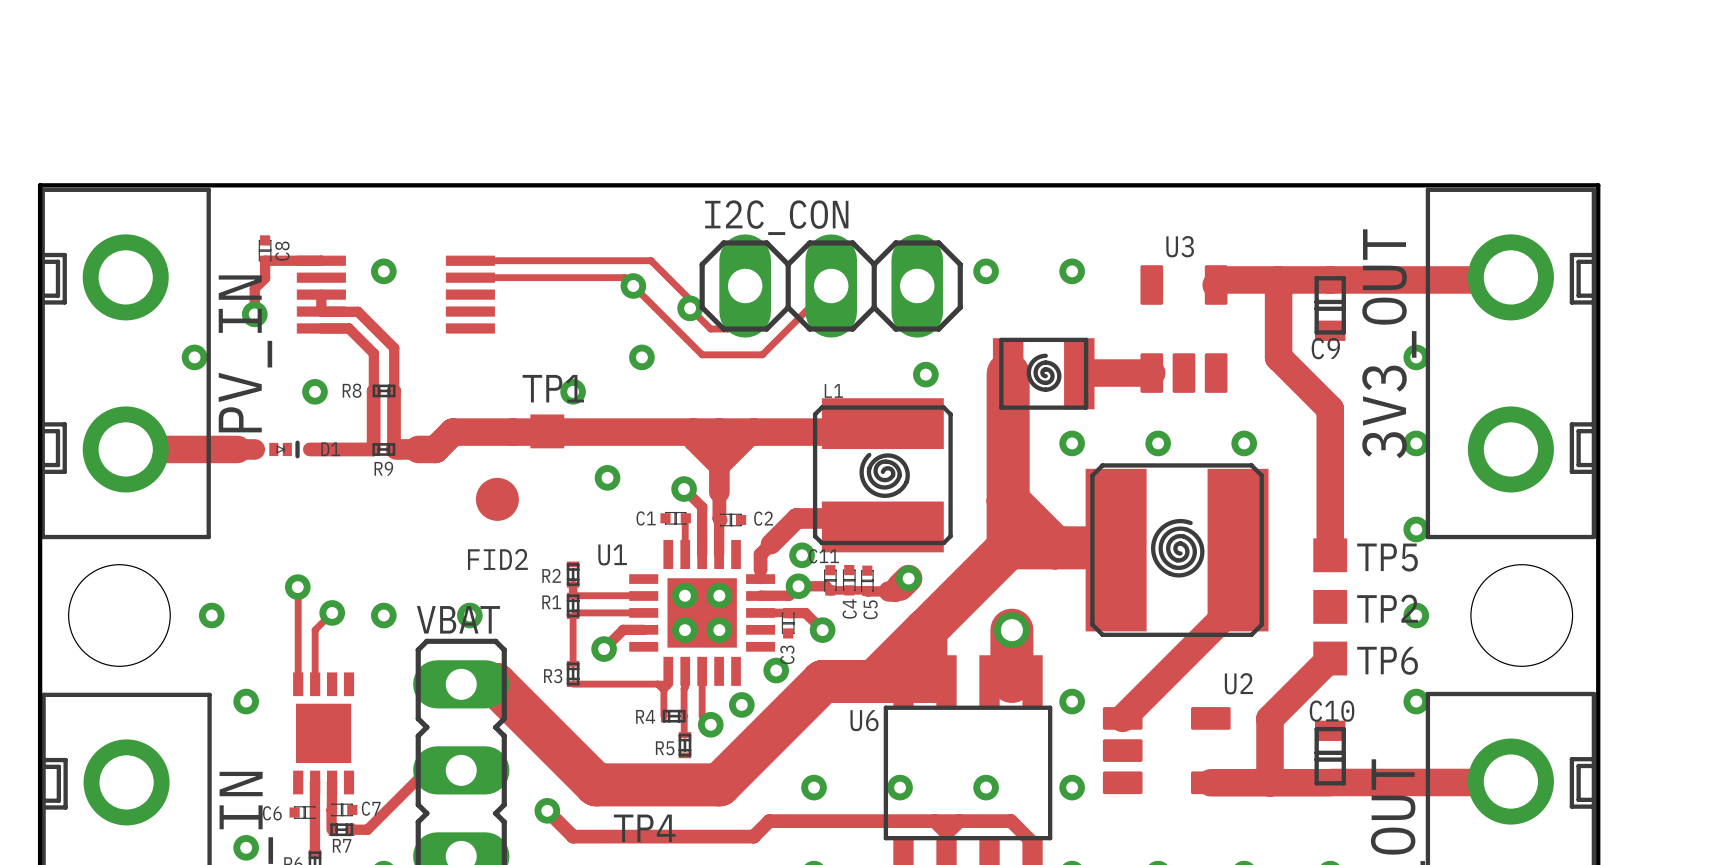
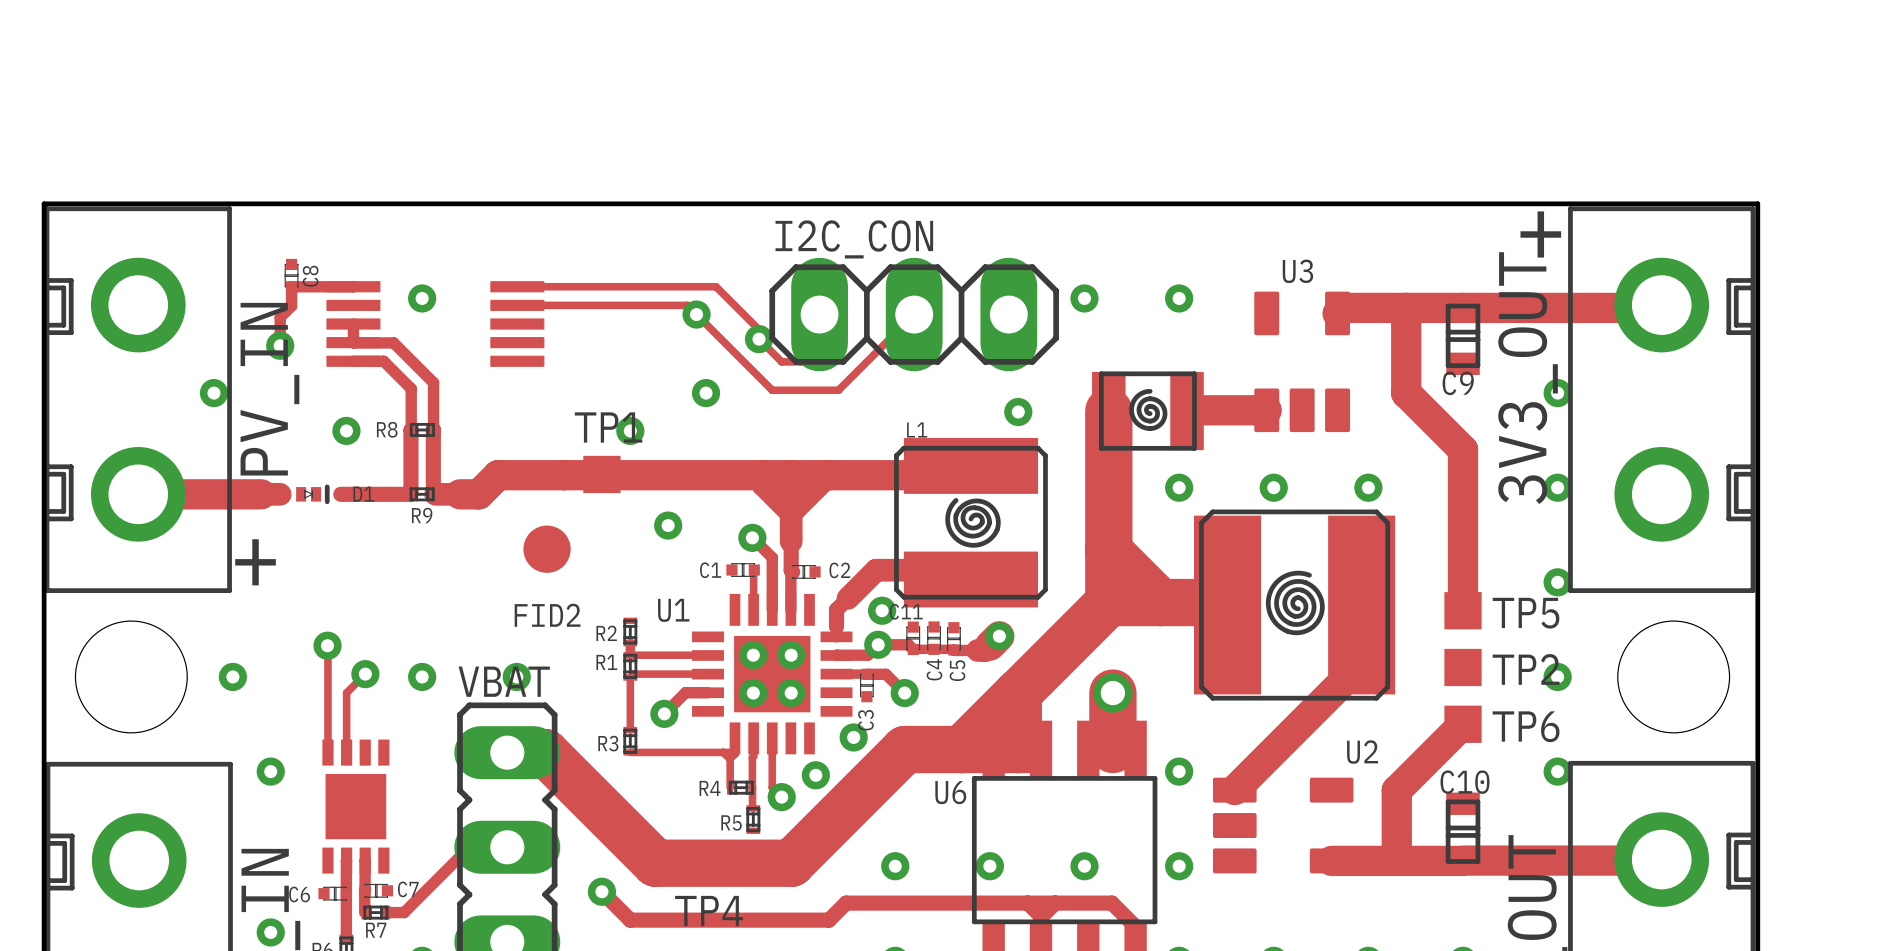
text: none -> + (1540, 234)
text: none -> + (255, 562)

